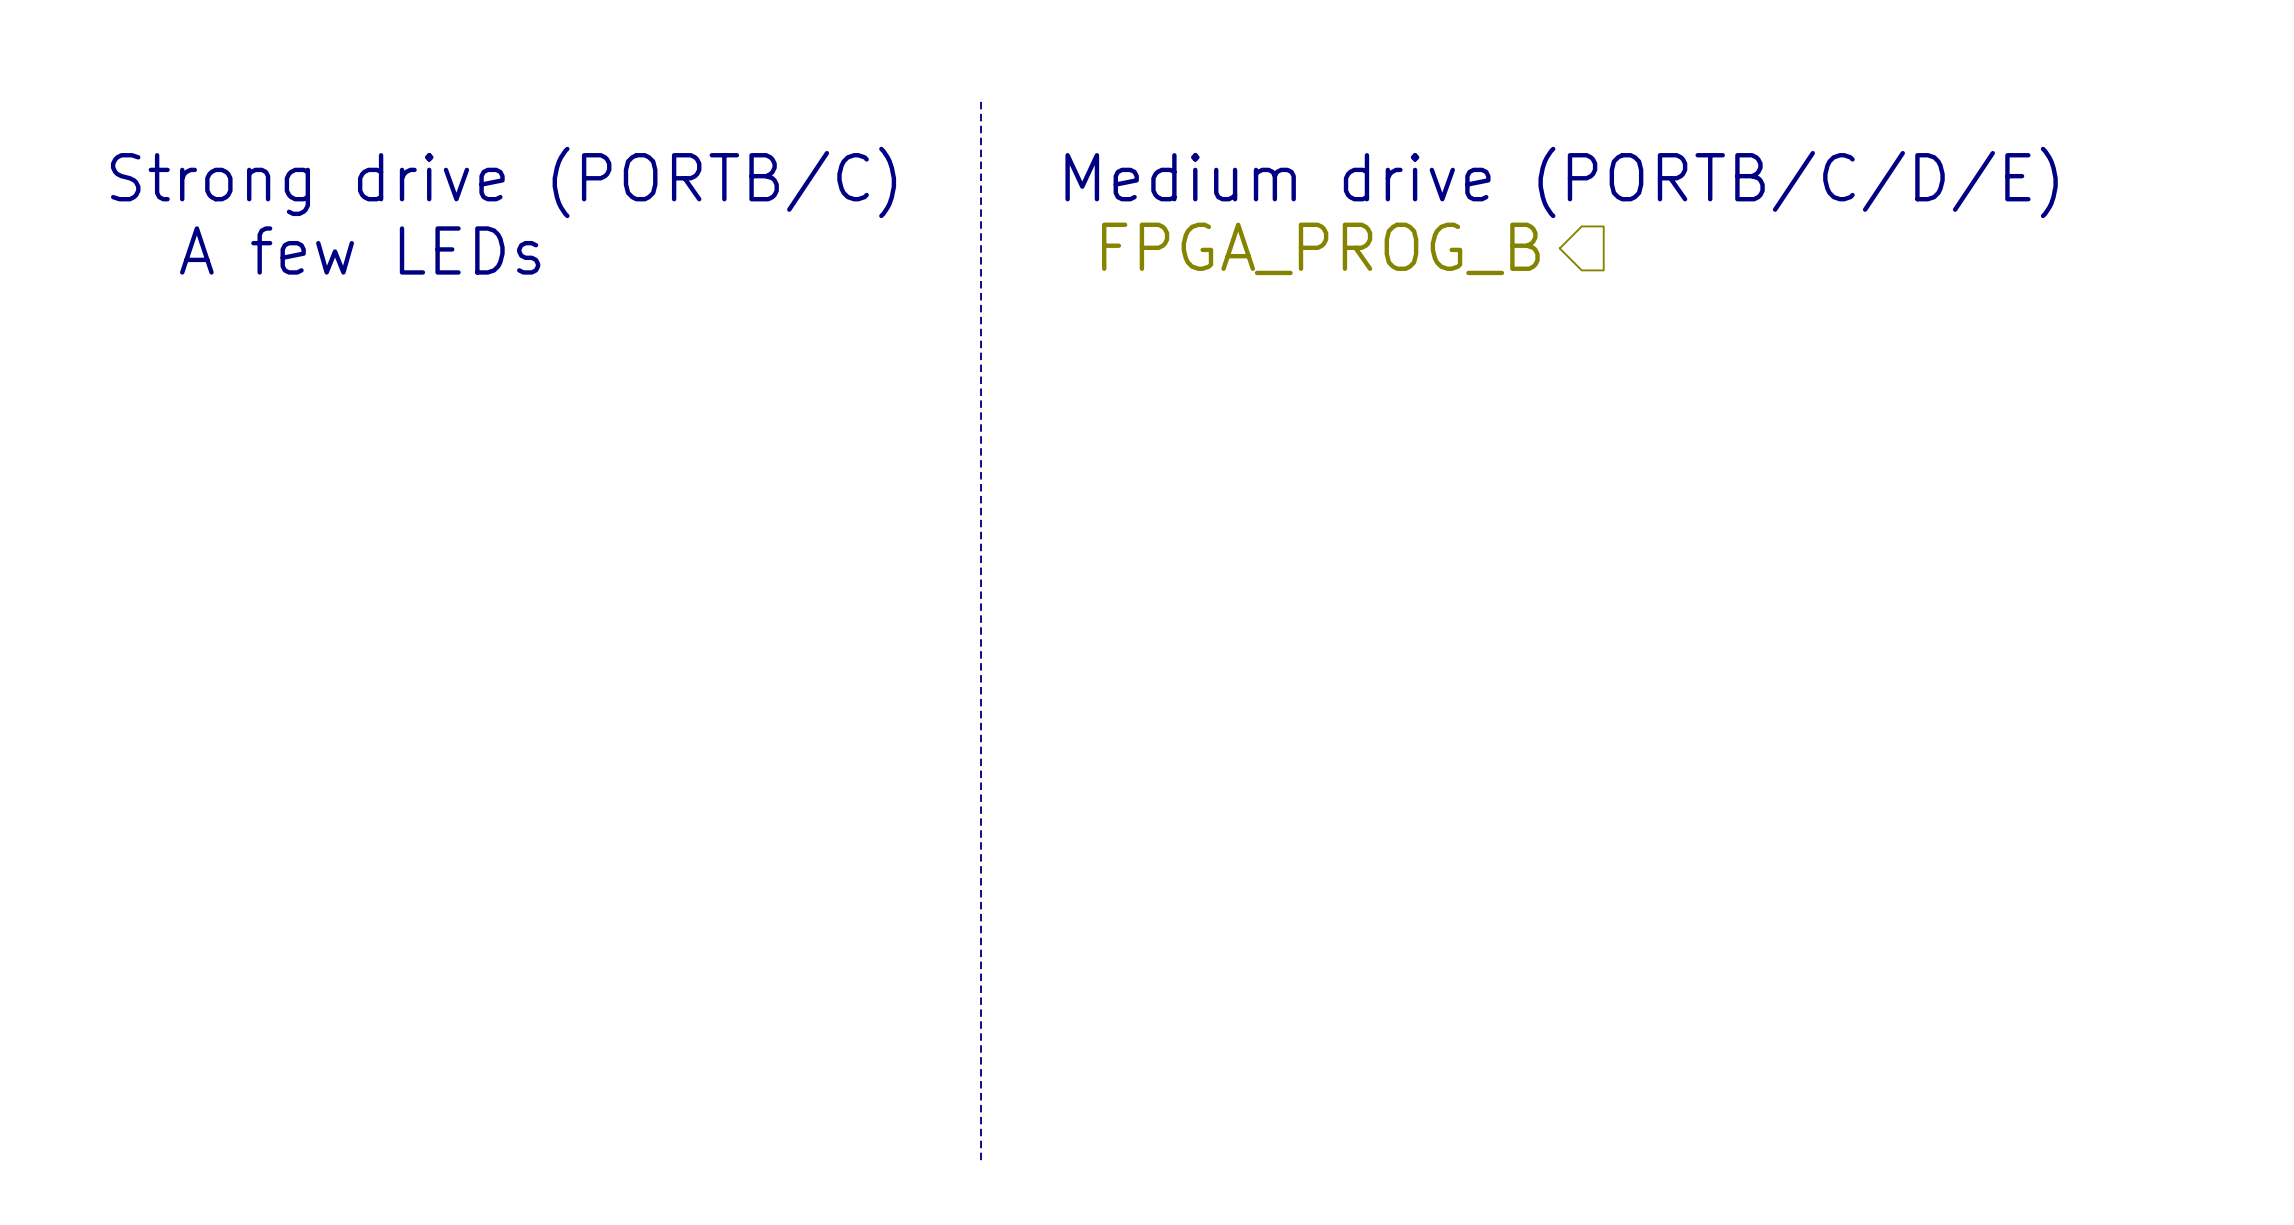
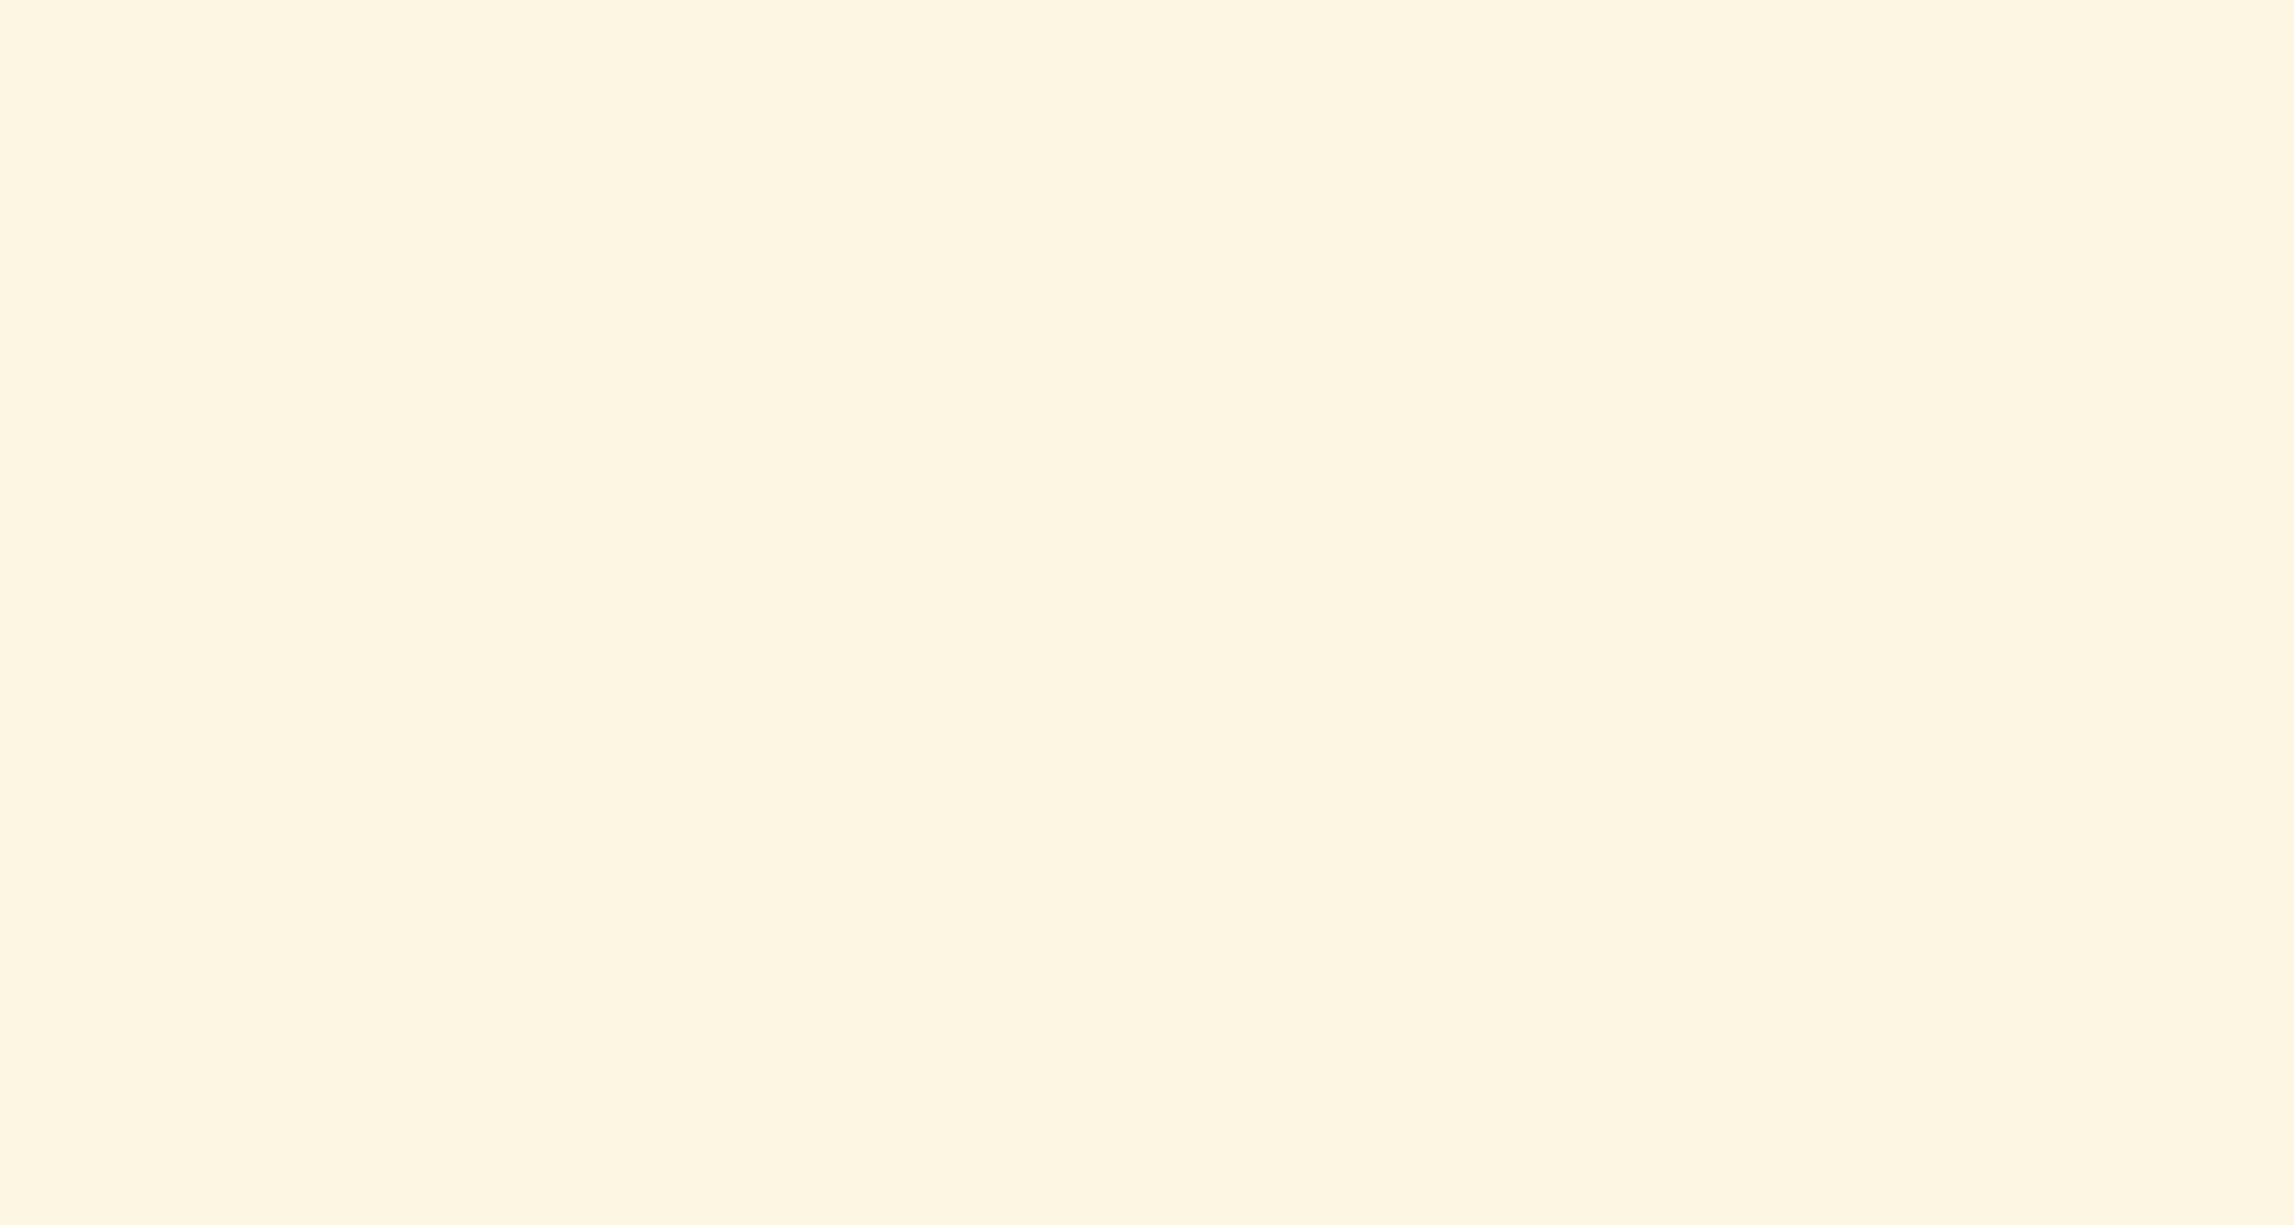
line: (981, 101) (981, 1164) -> none
text: Strong drive (PORTB/C) (503, 182) -> none
text: Medium drive (PORTB/C/D/E) (1561, 182) -> none
hierarchical label: FPGA_PROG_B (1320, 248) -> none
text: A few LEDs (360, 250) -> none

